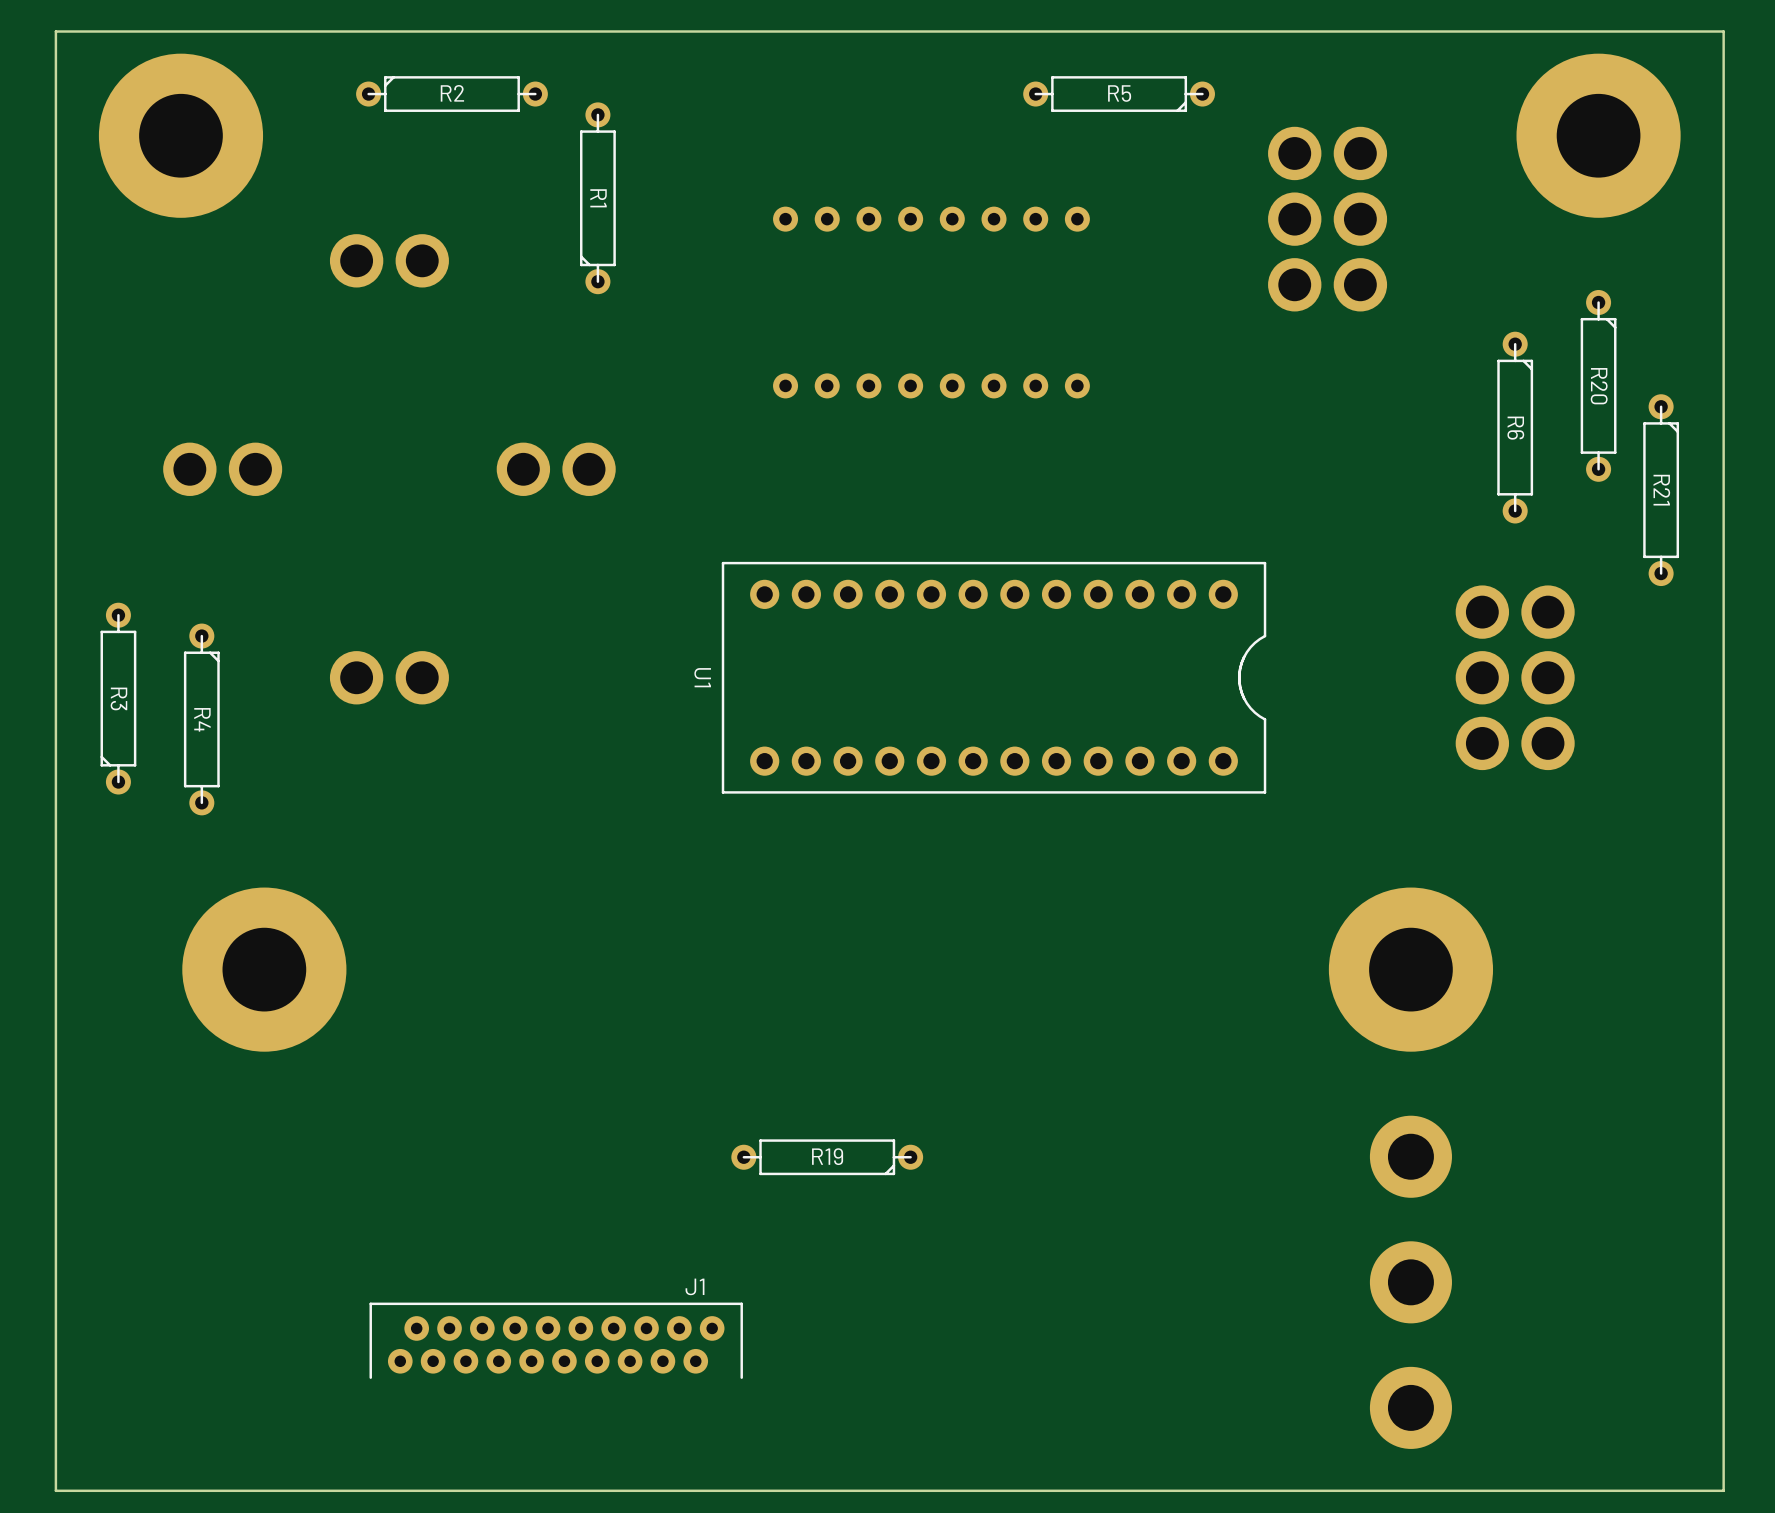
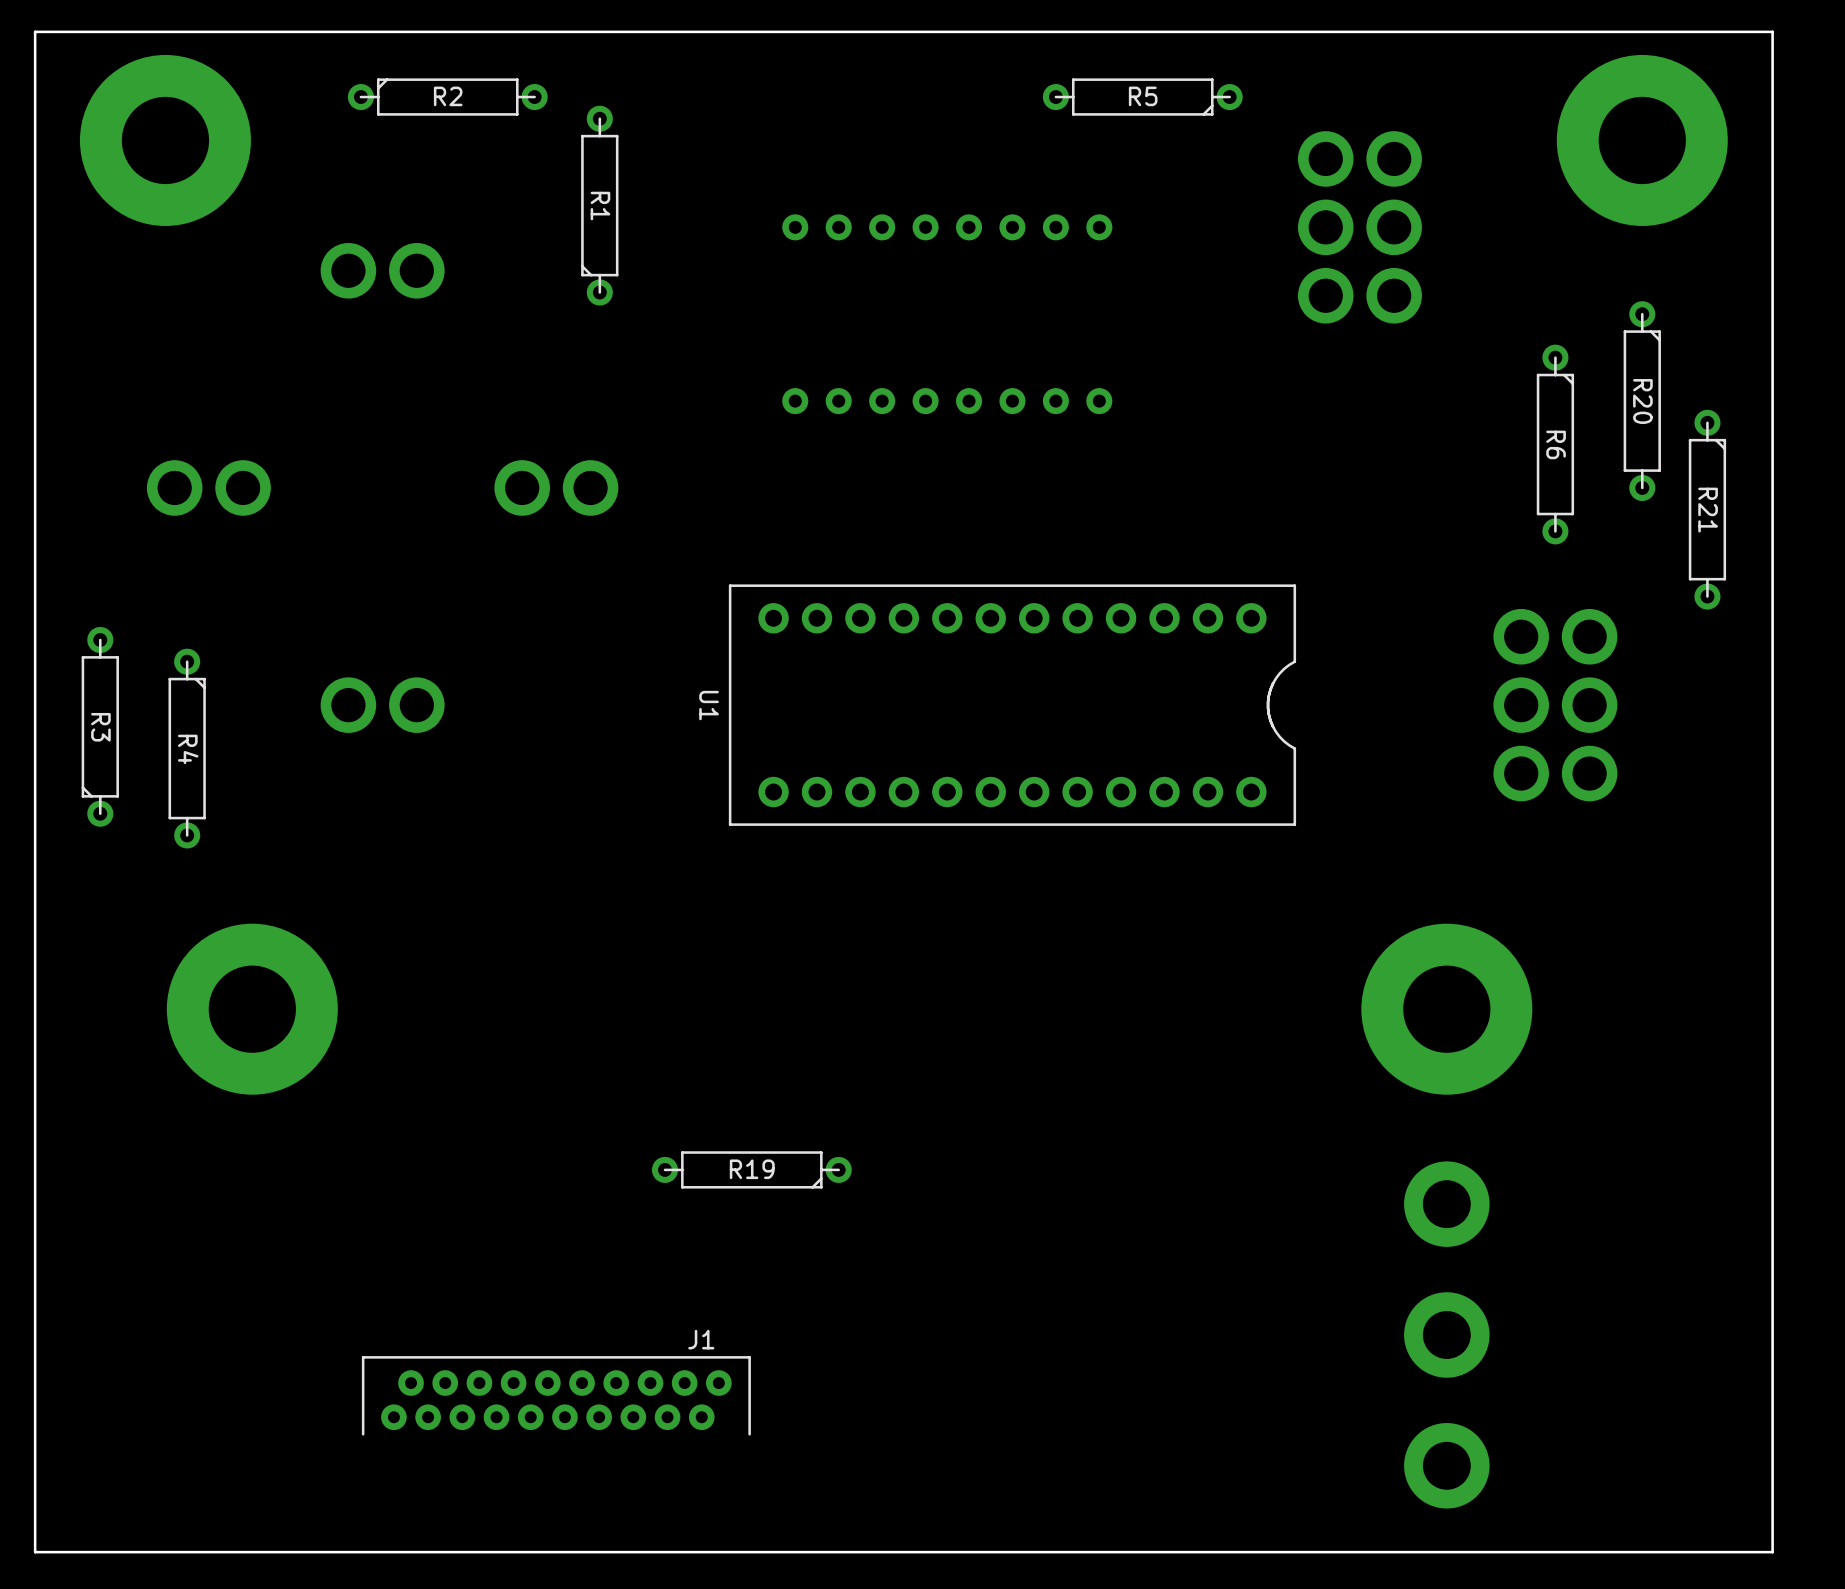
R19 position: (827, 1157) -> (751, 1169)

